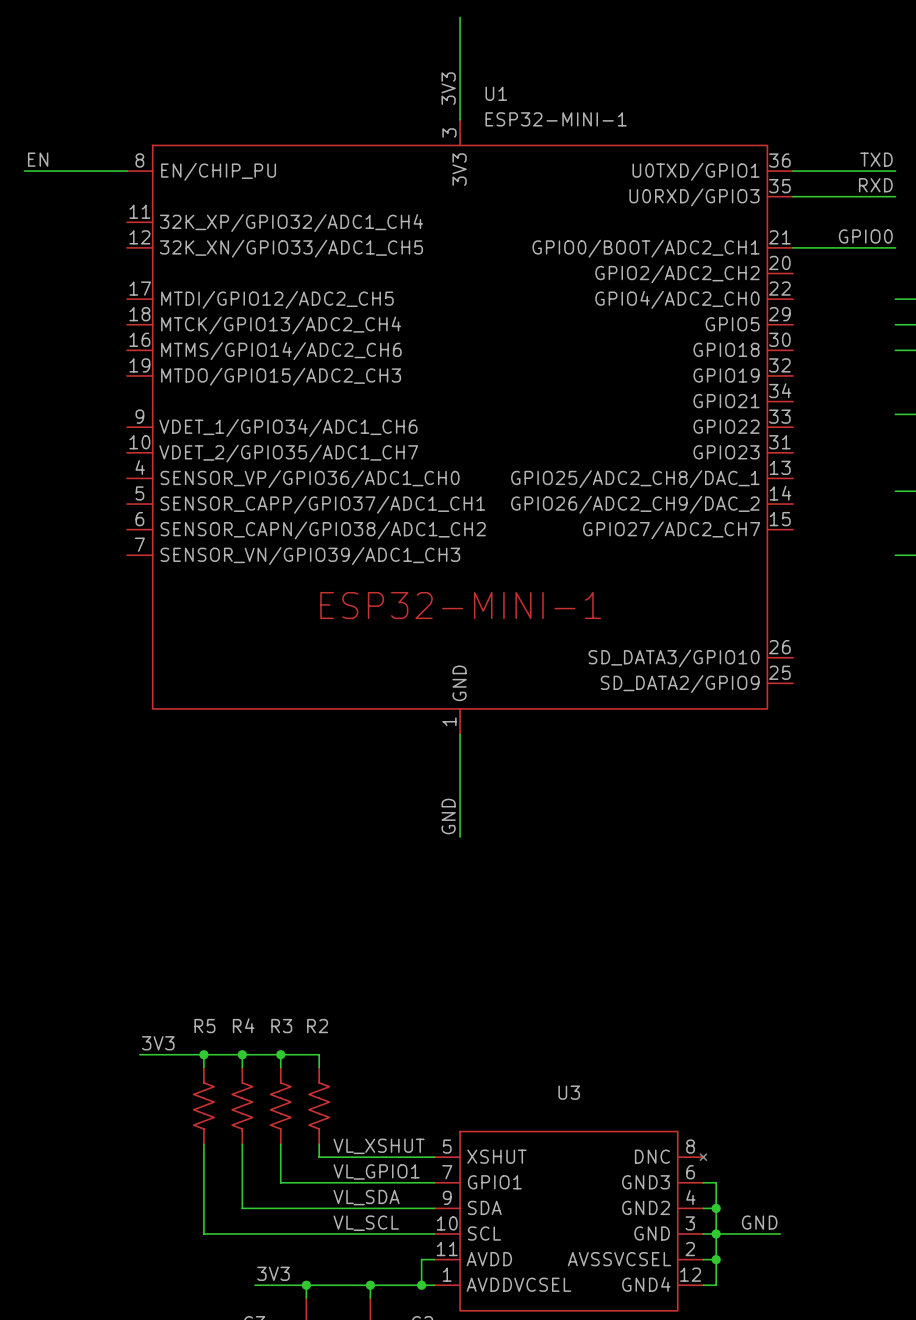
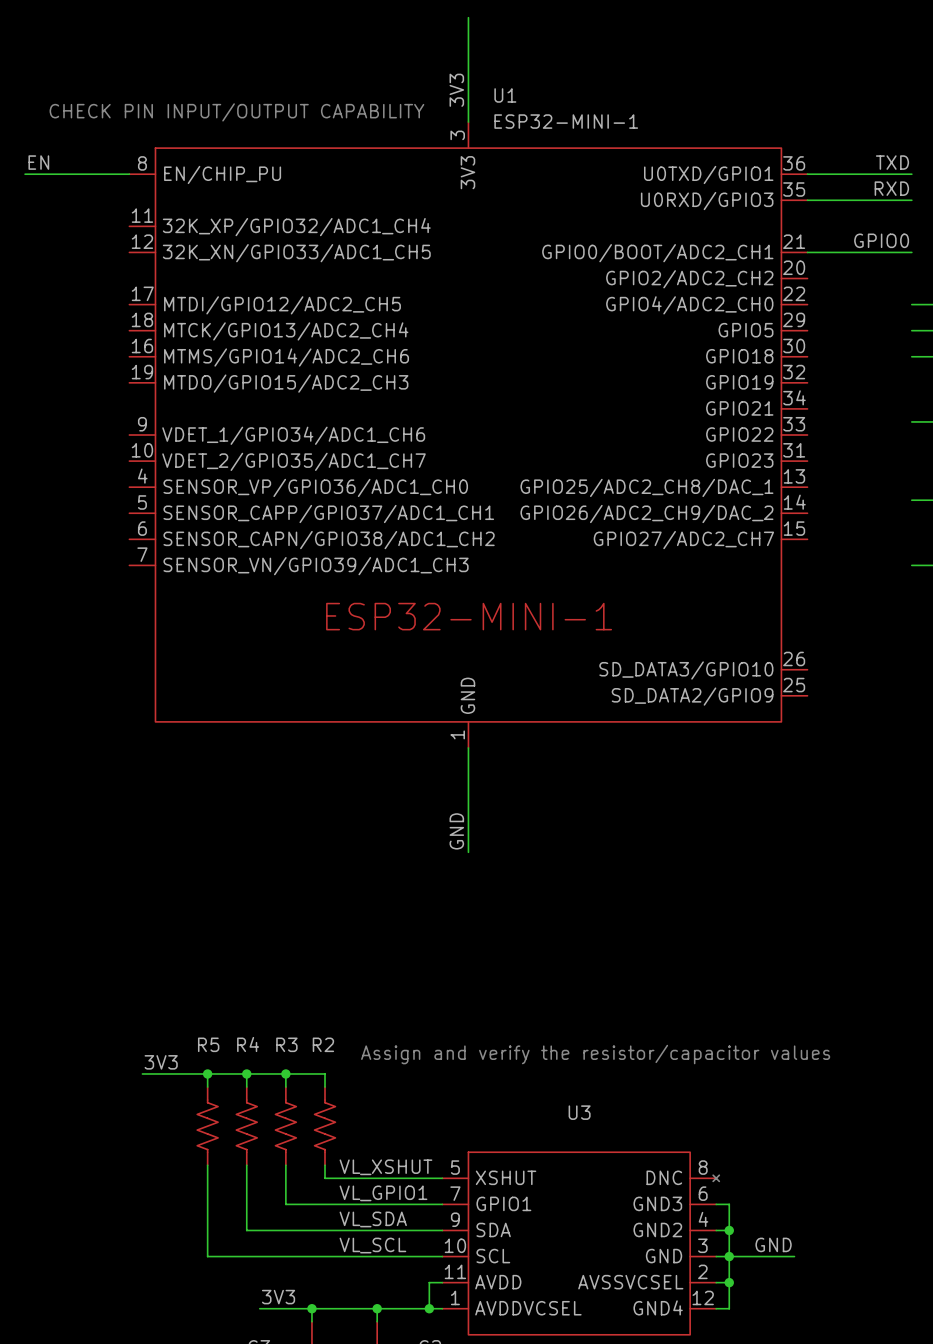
text: none -> CHECK PIN INPUT/OUTPUT CAPABILITY (236, 112)
text: none -> Assign and verify the resistor/capacitor values (595, 1054)

